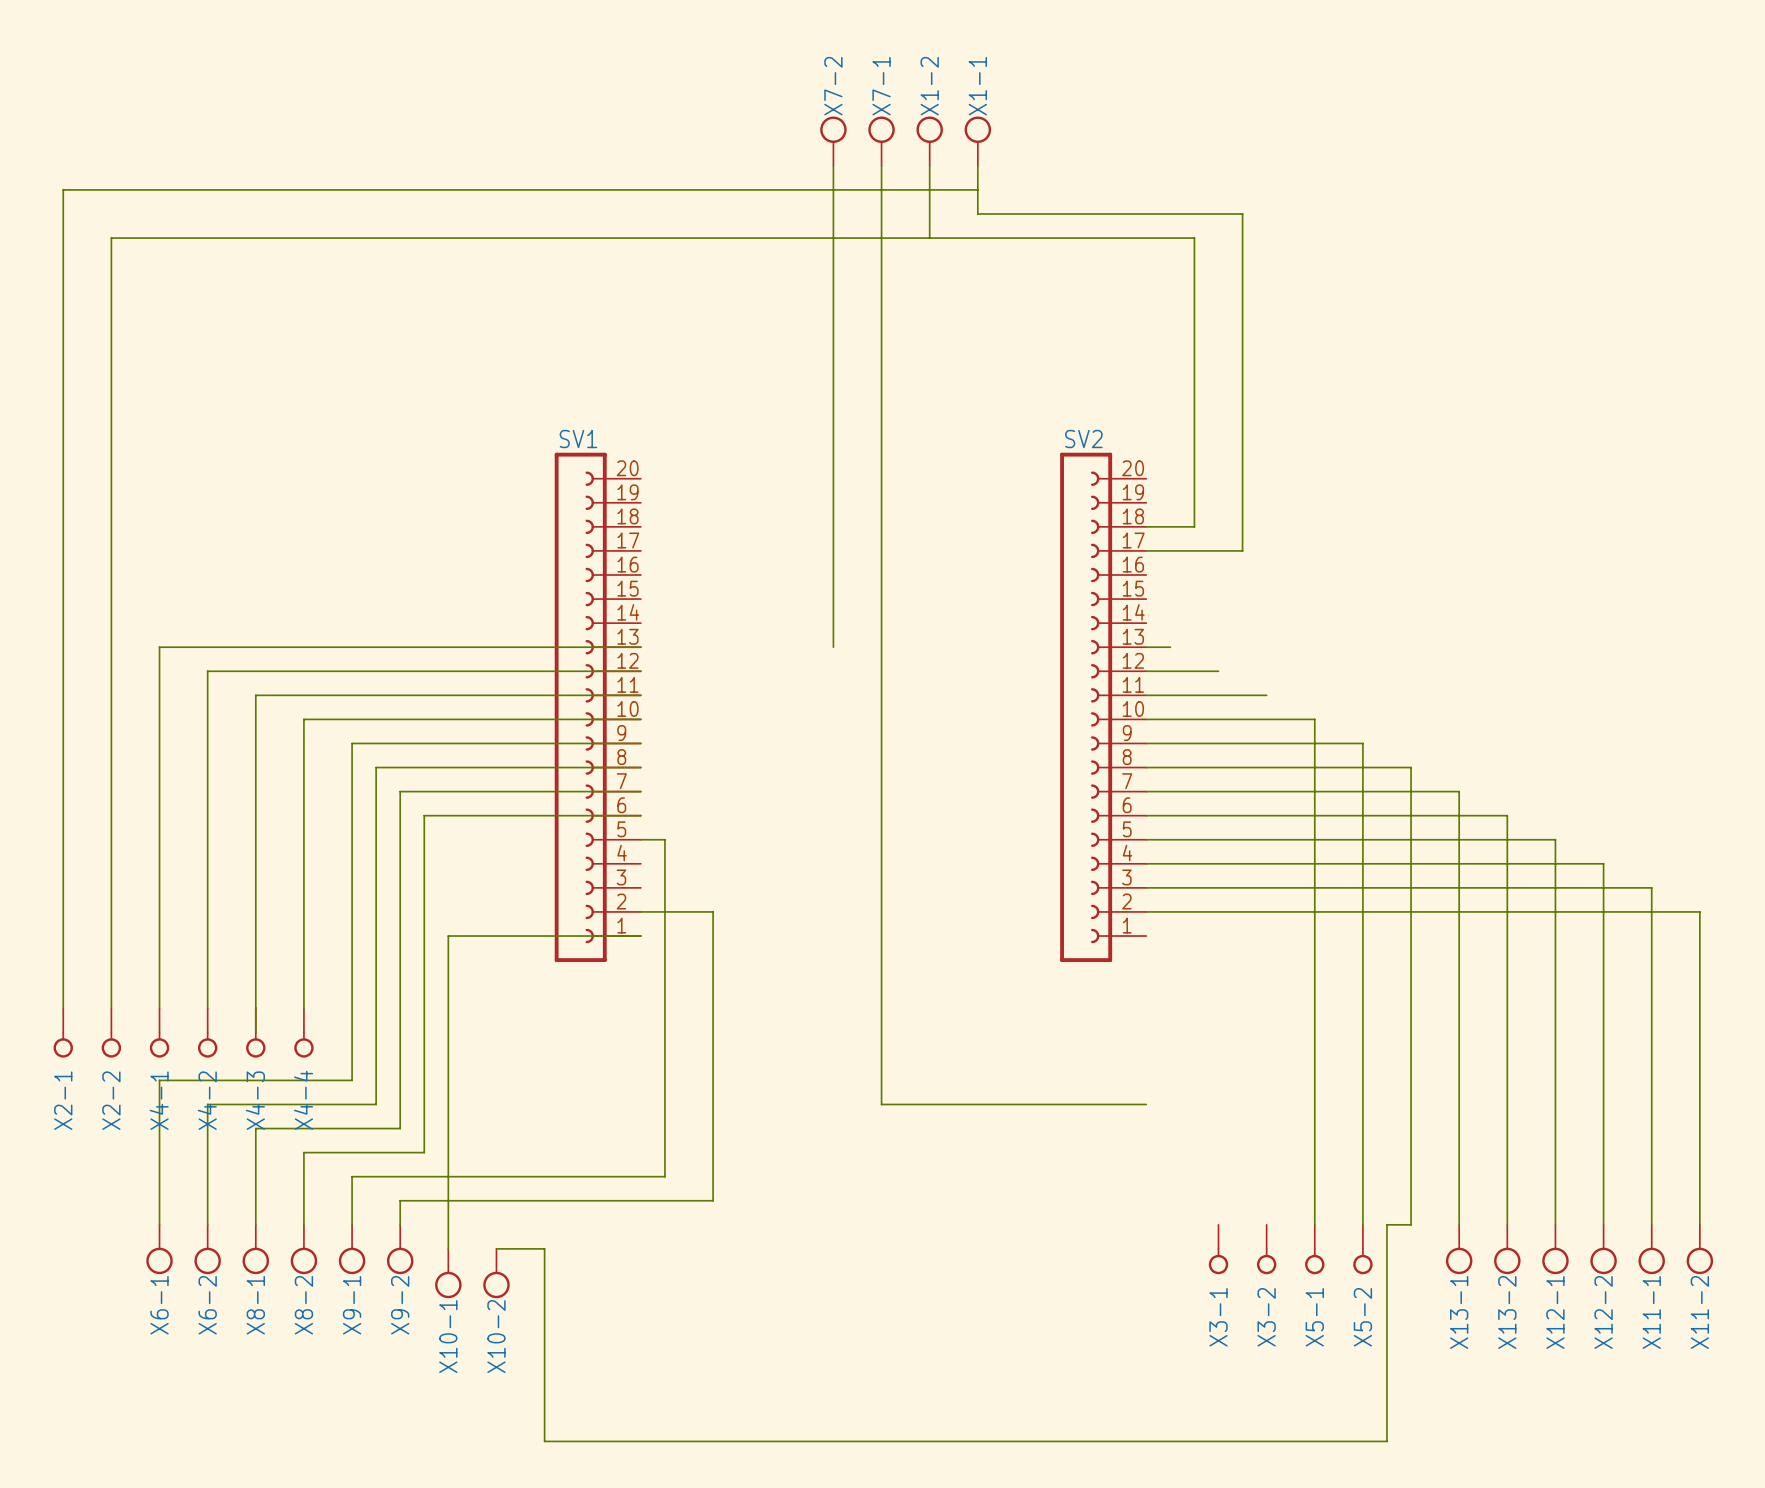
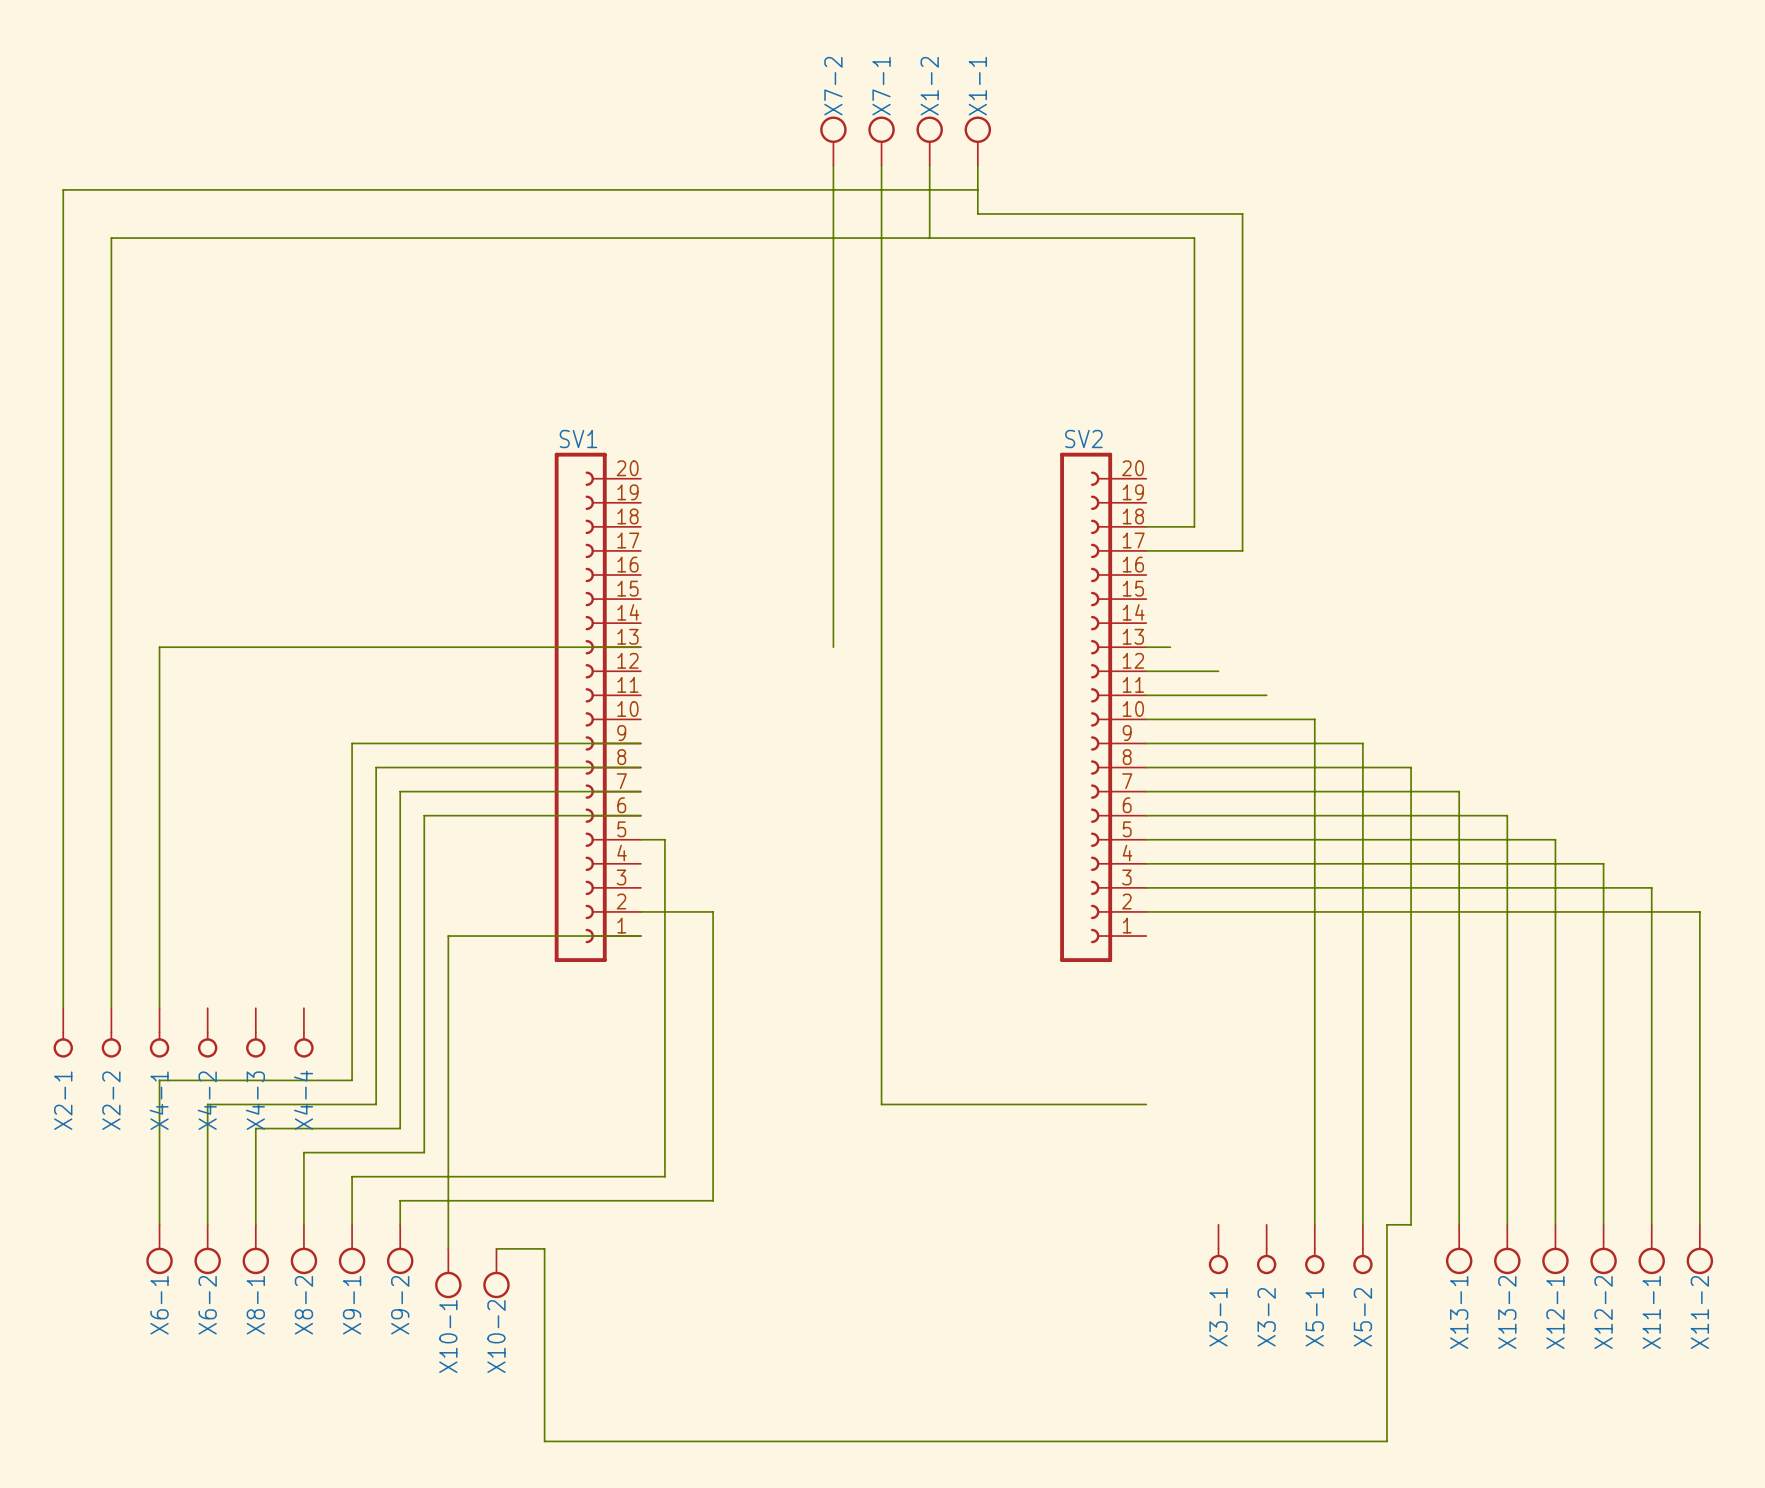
wire: (640, 671) (207, 671) (207, 1008) -> none
wire: (640, 695) (255, 695) (255, 1032) -> none
wire: (640, 719) (303, 719) (303, 1008) -> none

